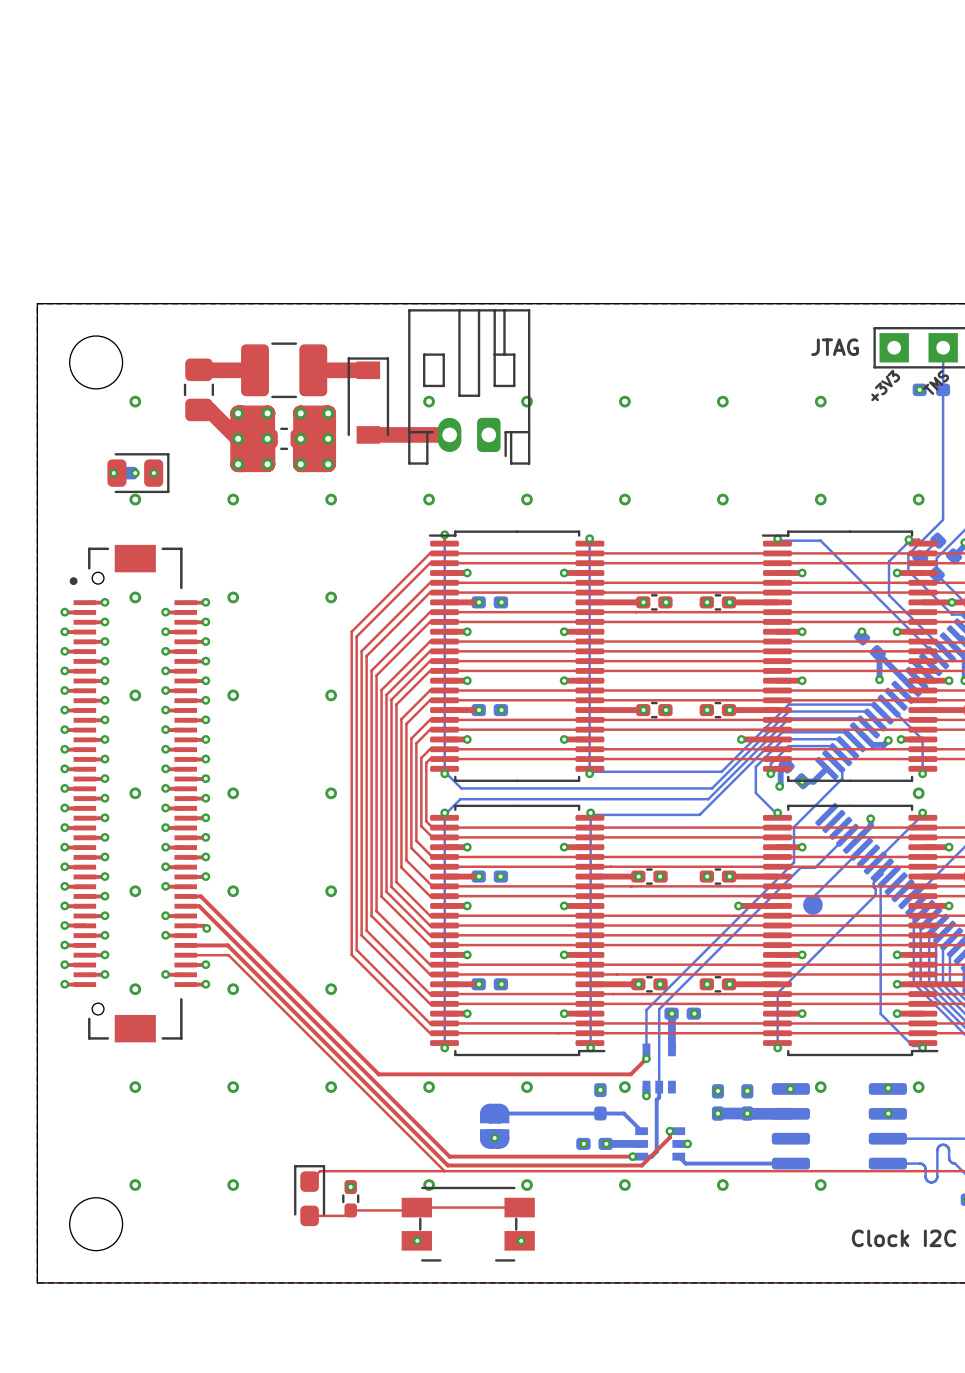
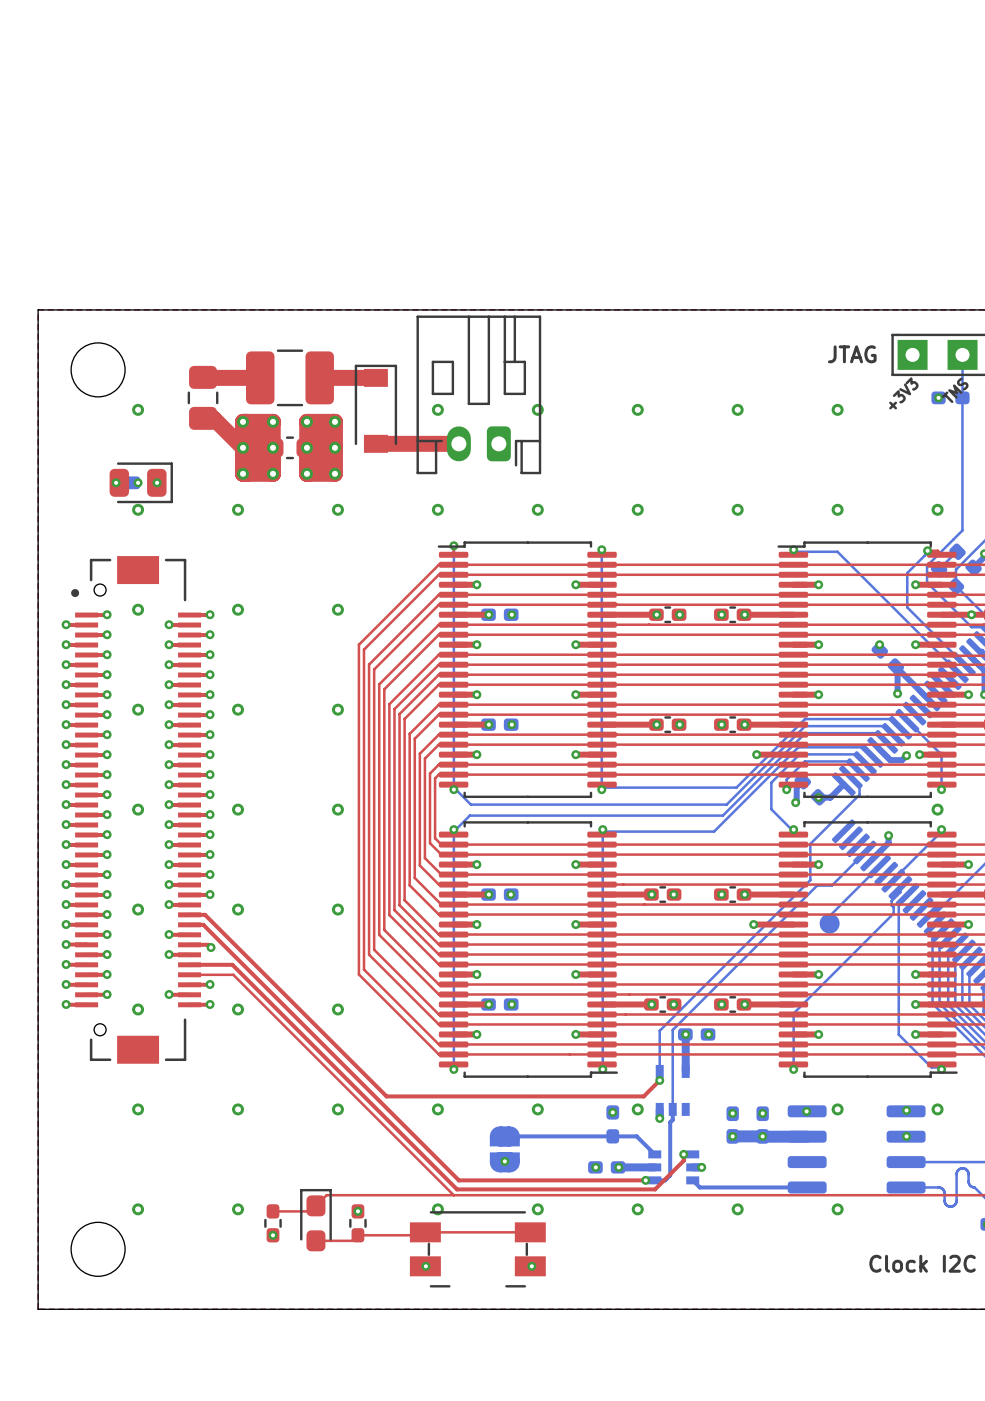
top track: none -> (315, 1205) (310, 1211) (272, 1211)
part: none -> (272, 1223)
via: none -> (272, 1235)

